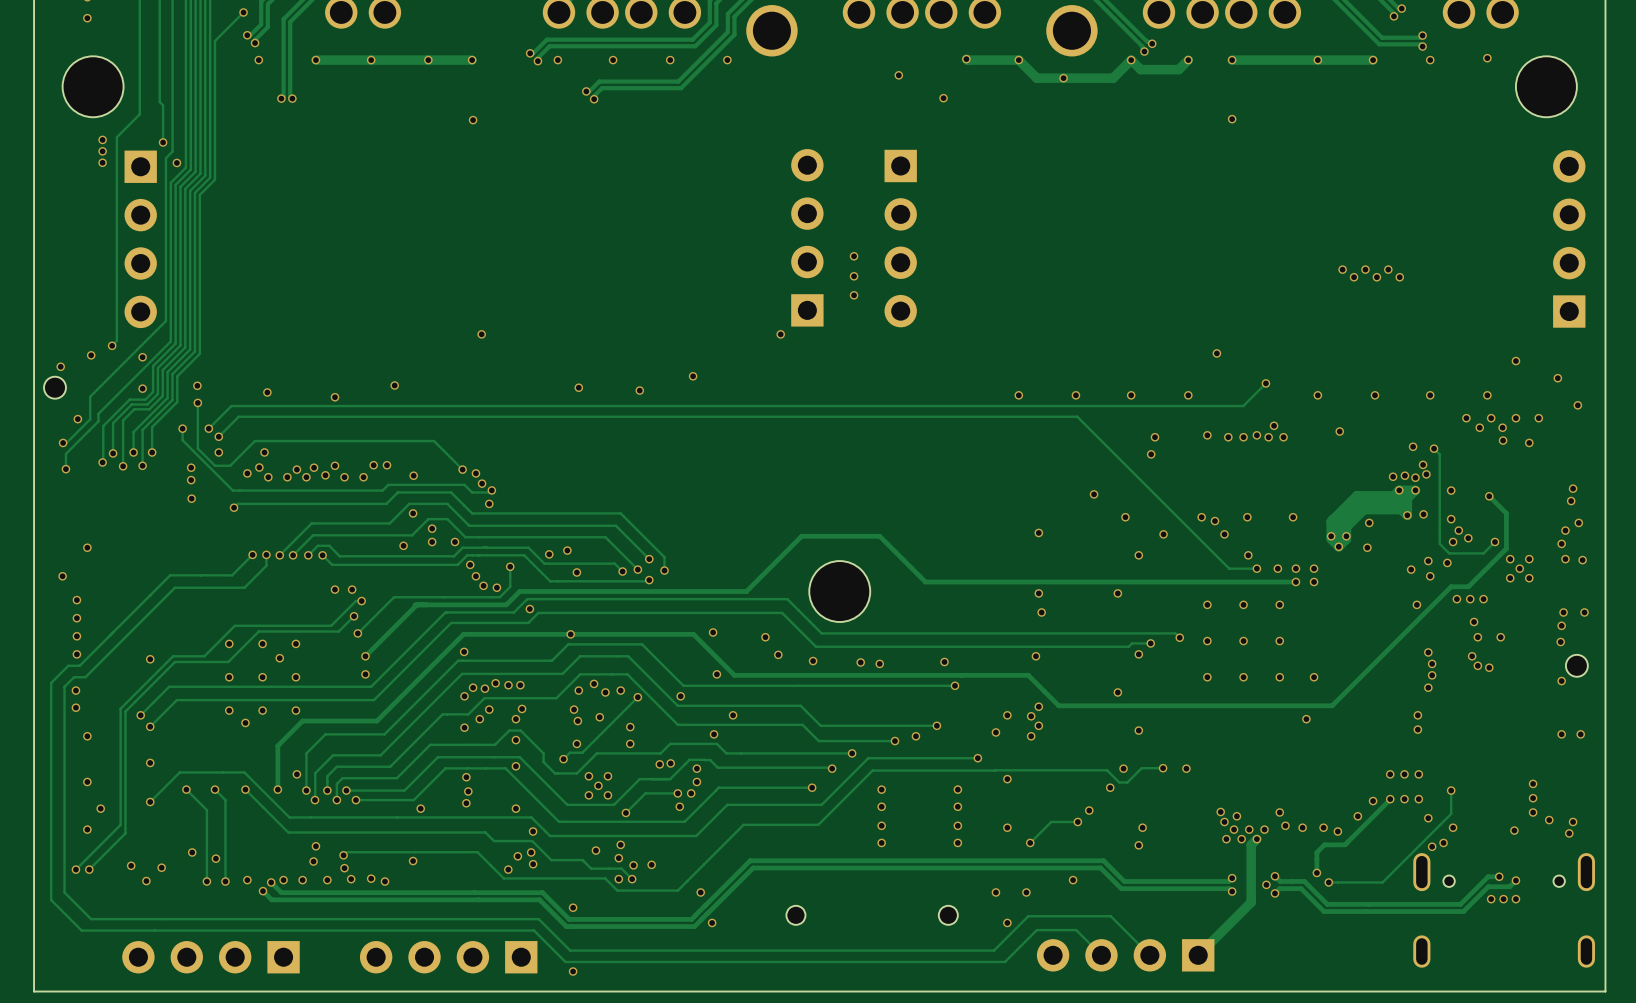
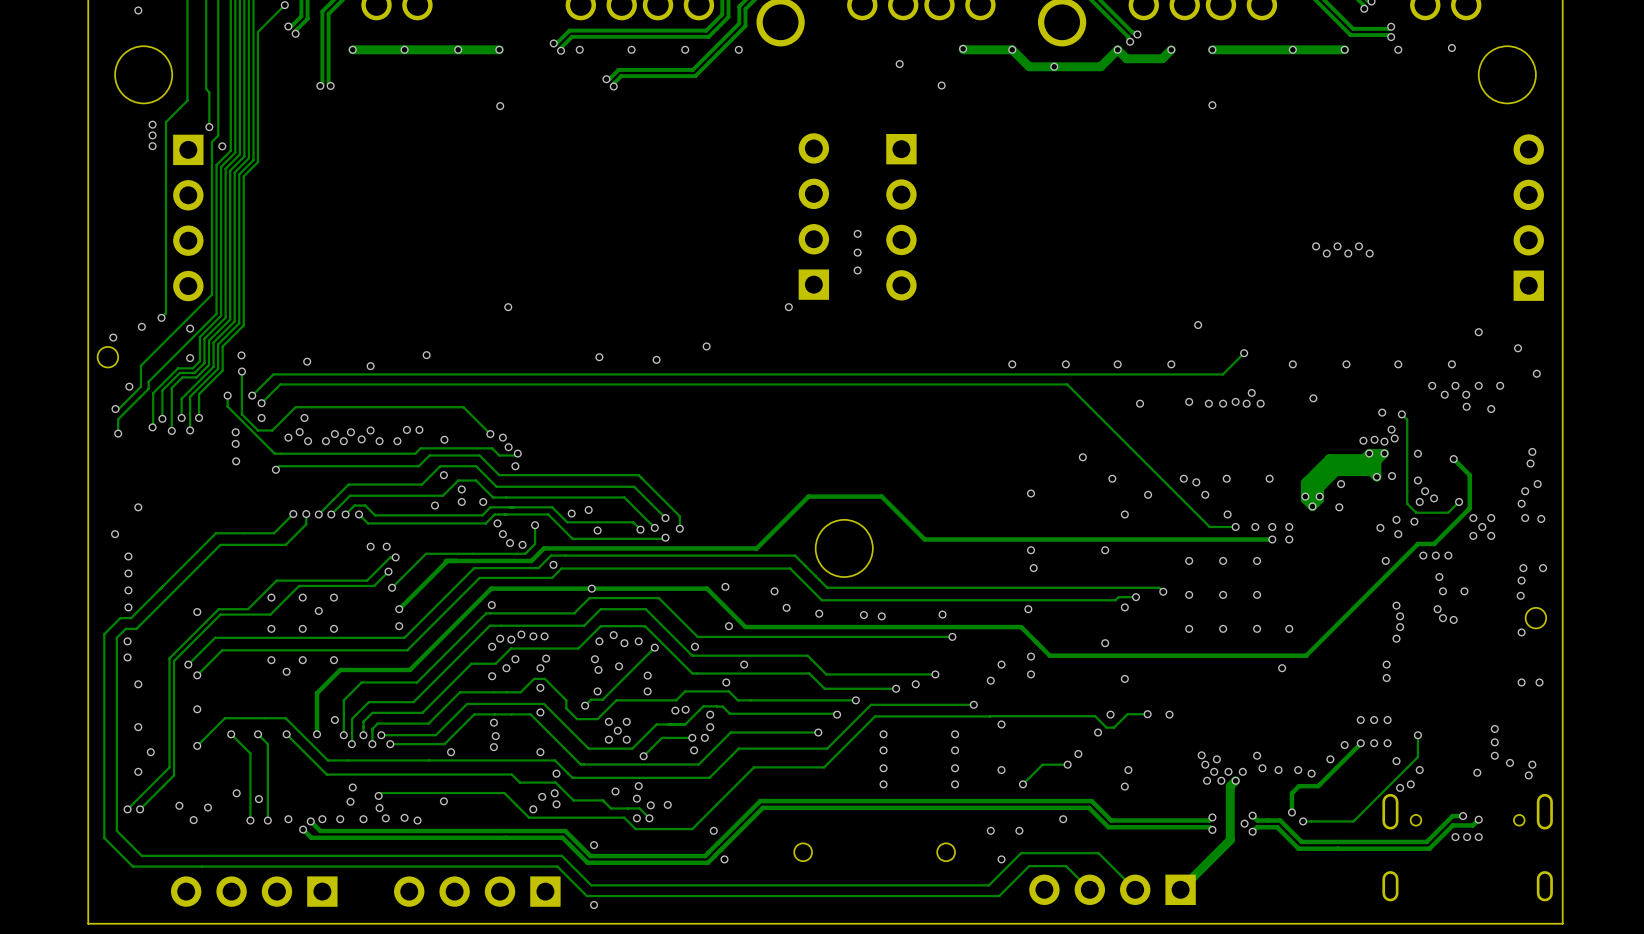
via: (258, 60) -> none
via: (1151, 454) -> none
via: (1031, 716) -> none
via: (1031, 736) -> none

